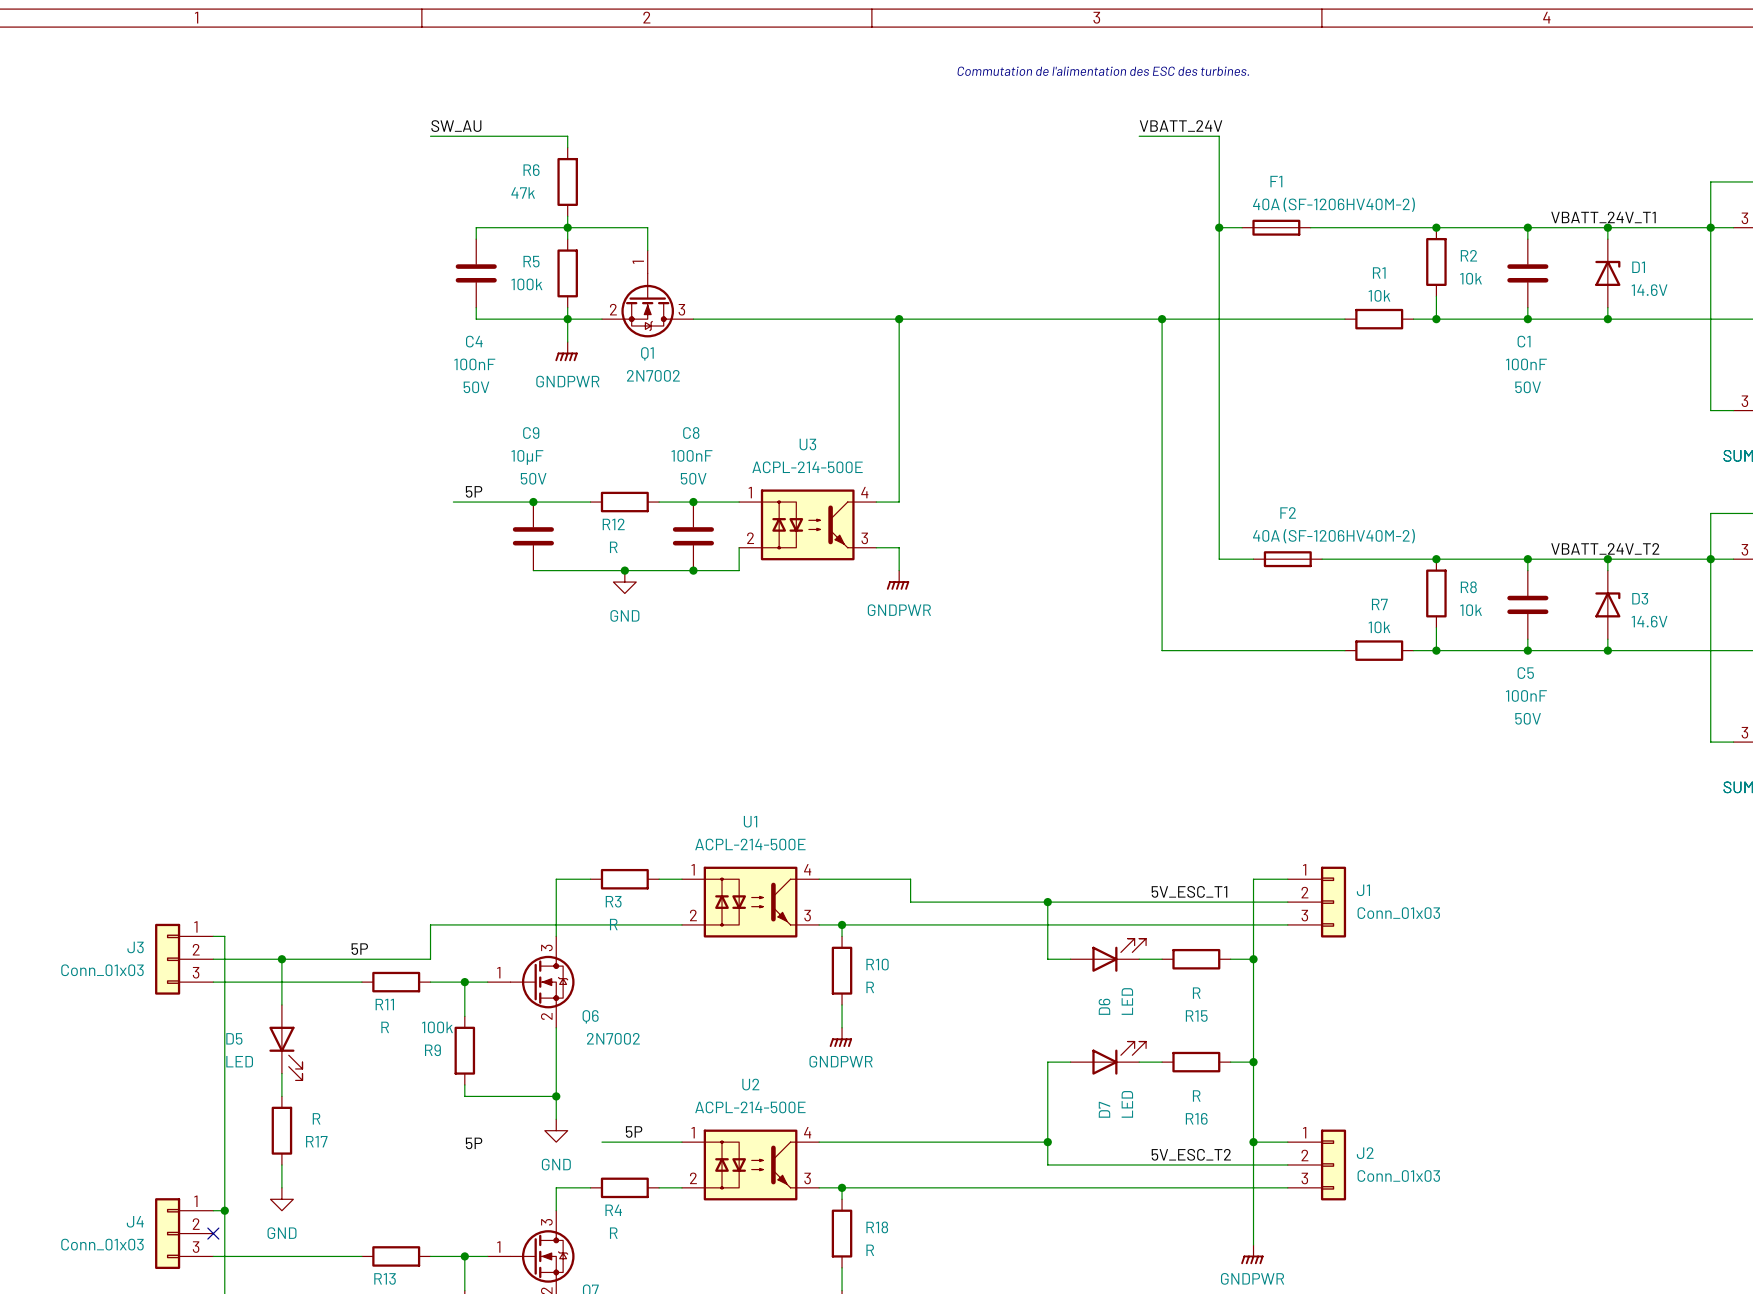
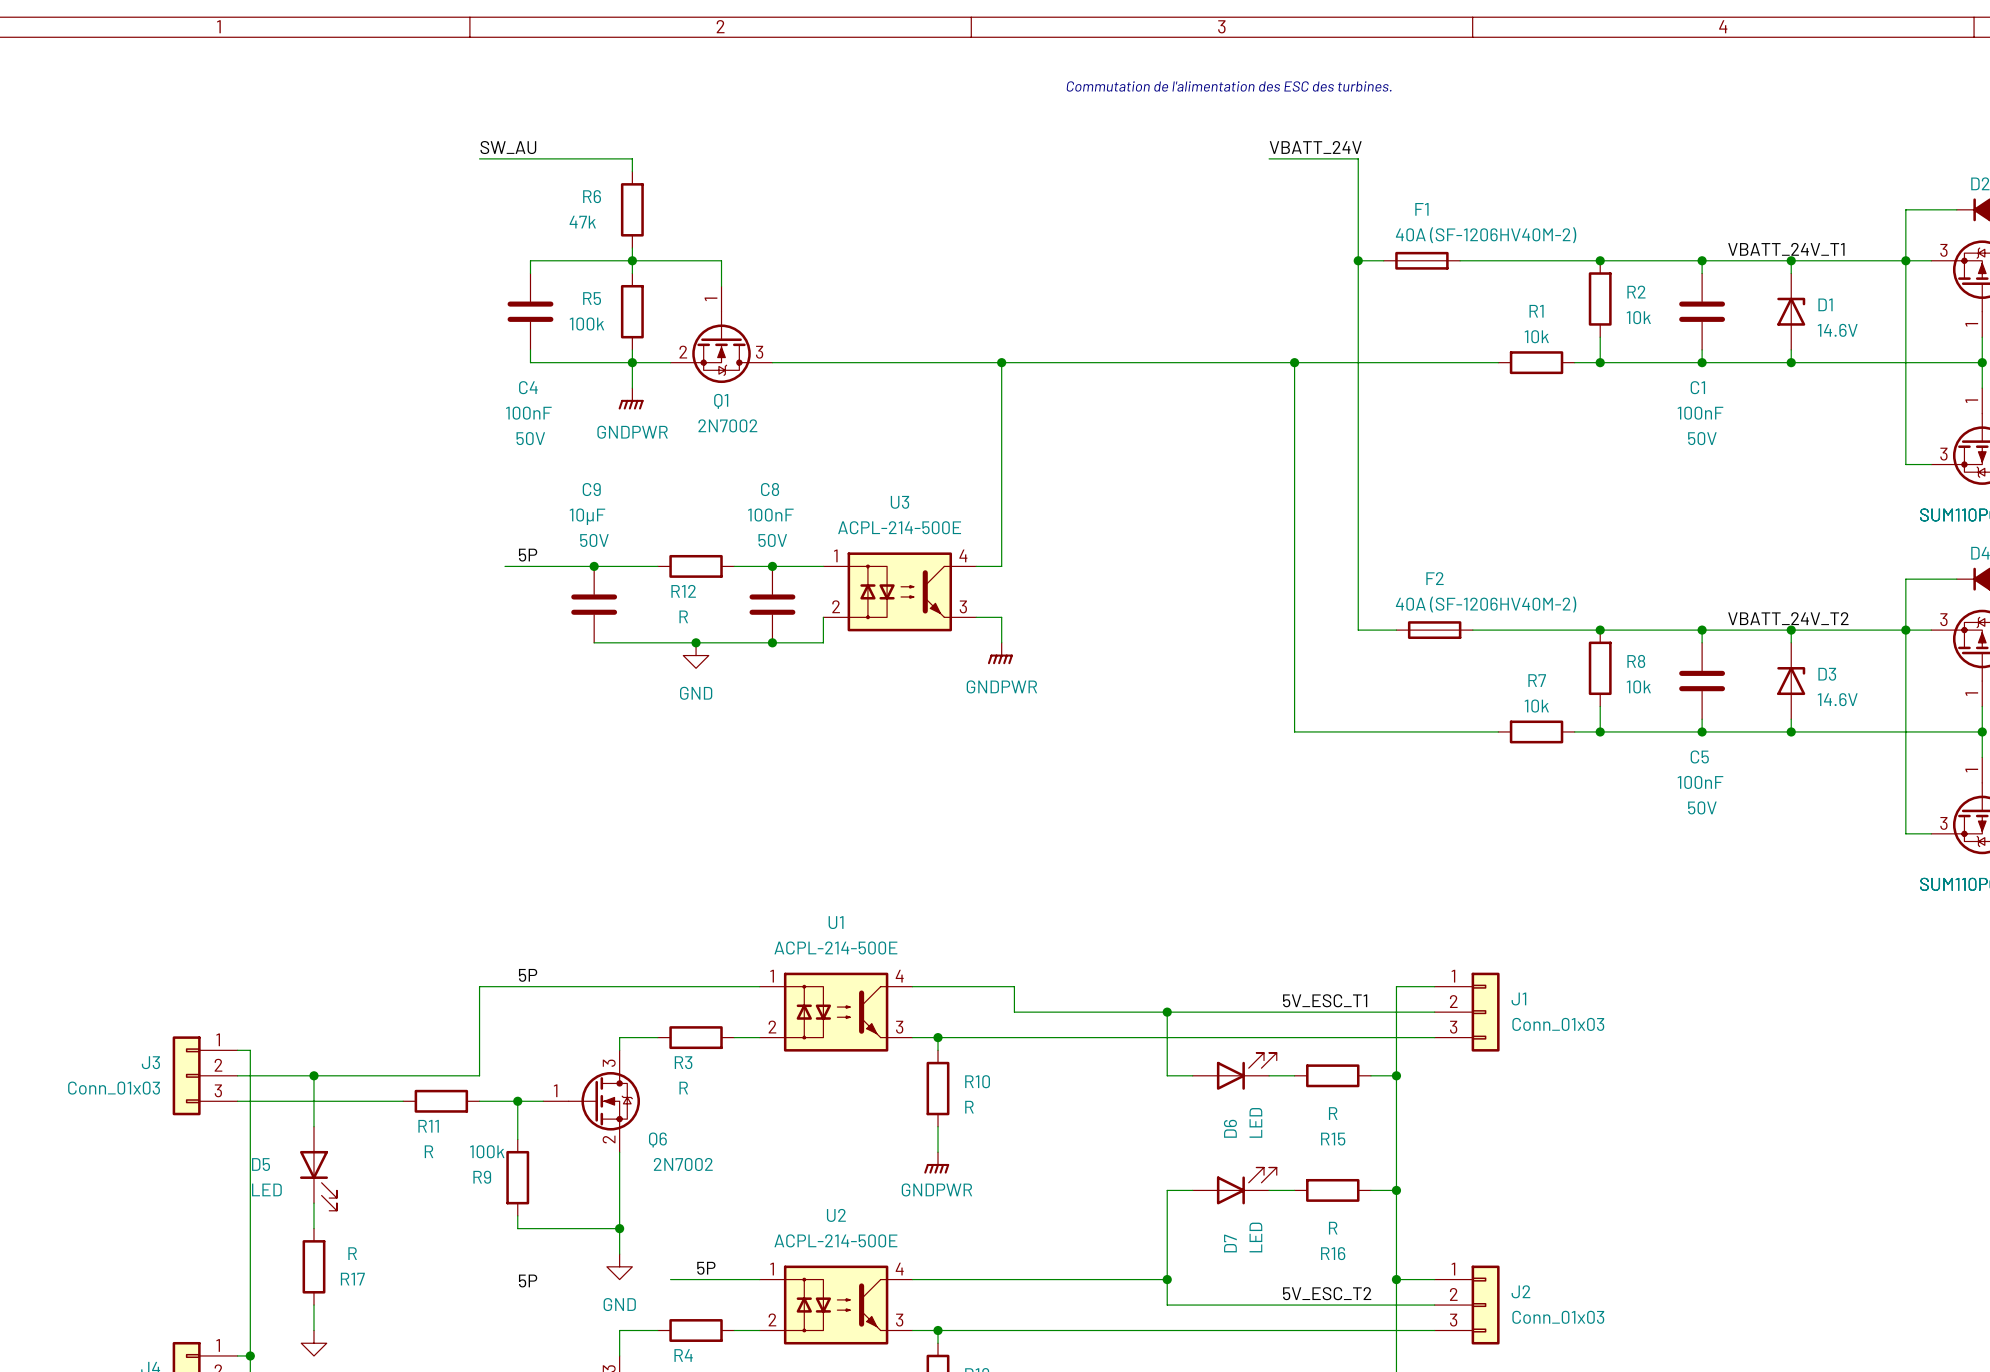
wire: (556, 879) (556, 924) (430, 924) -> (619, 986) (479, 986) (479, 1037)
R3 position: (624, 879) -> (696, 1037)
wire: (590, 924) (659, 924) -> (657, 986) (734, 986)
label position: 5P (359, 949) -> 5P (528, 975)

